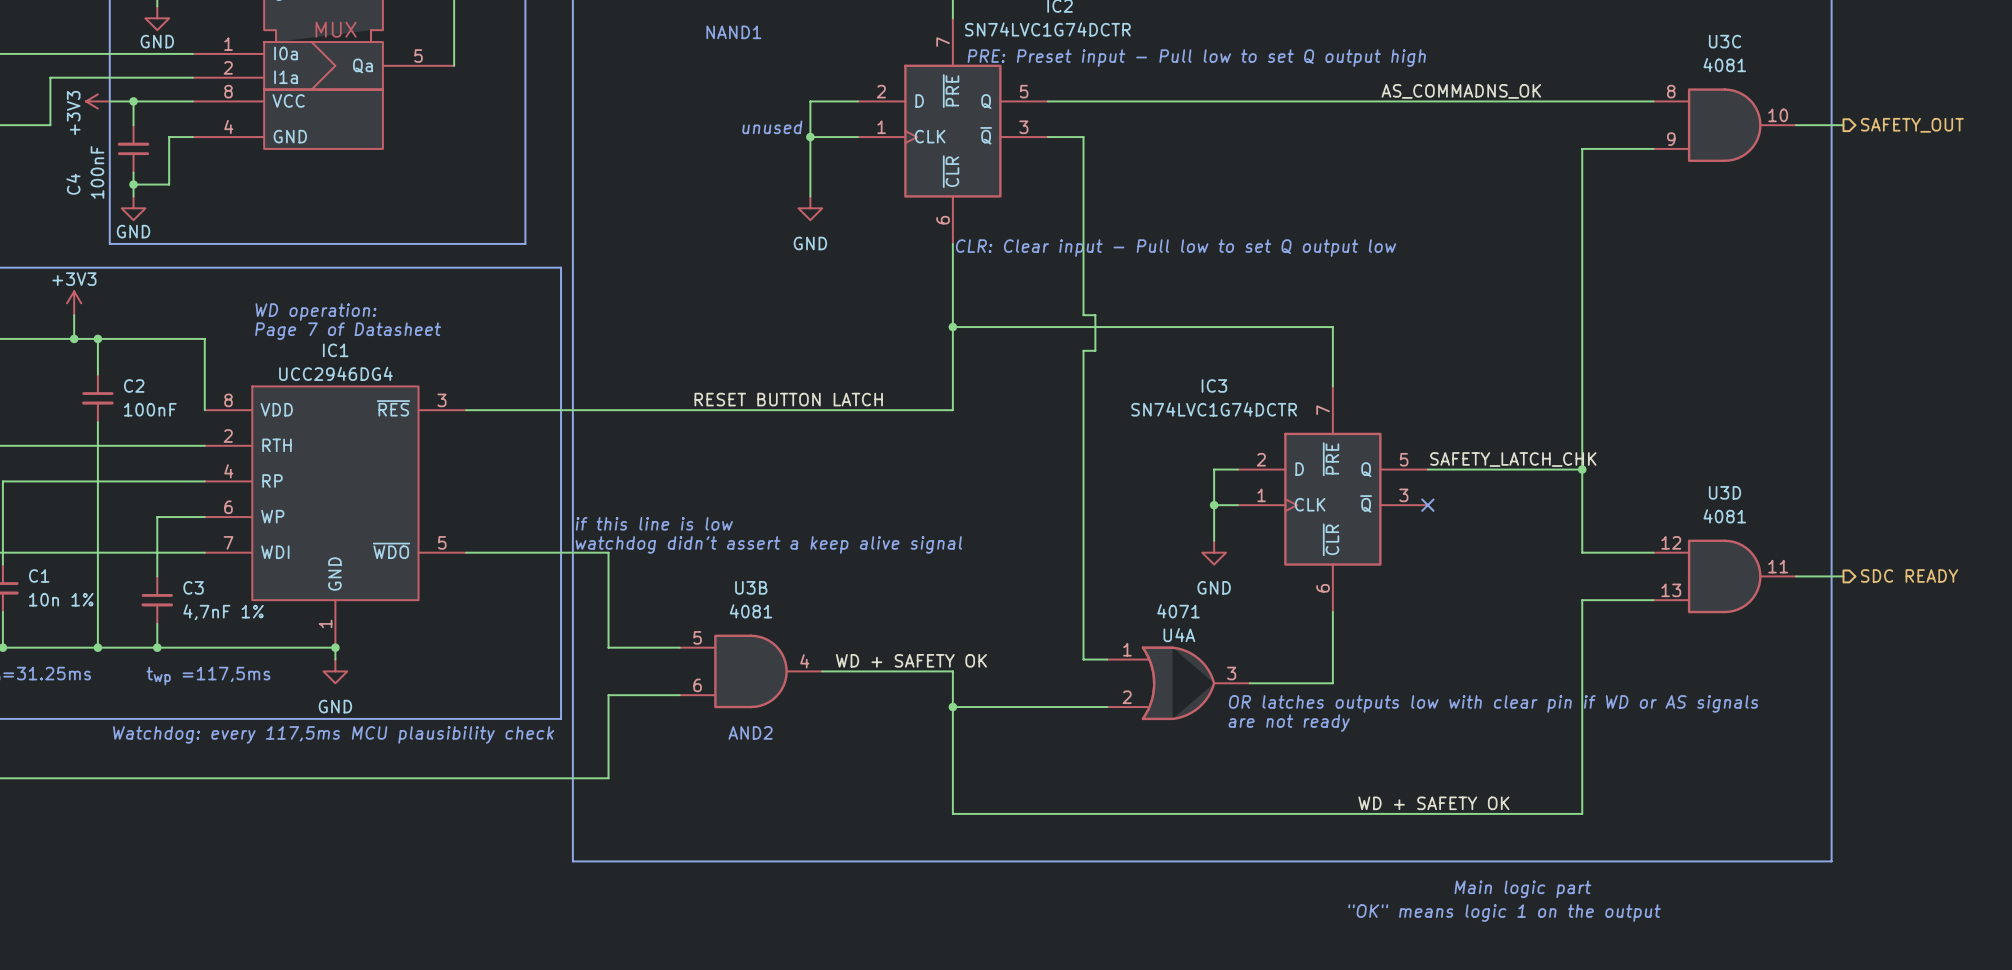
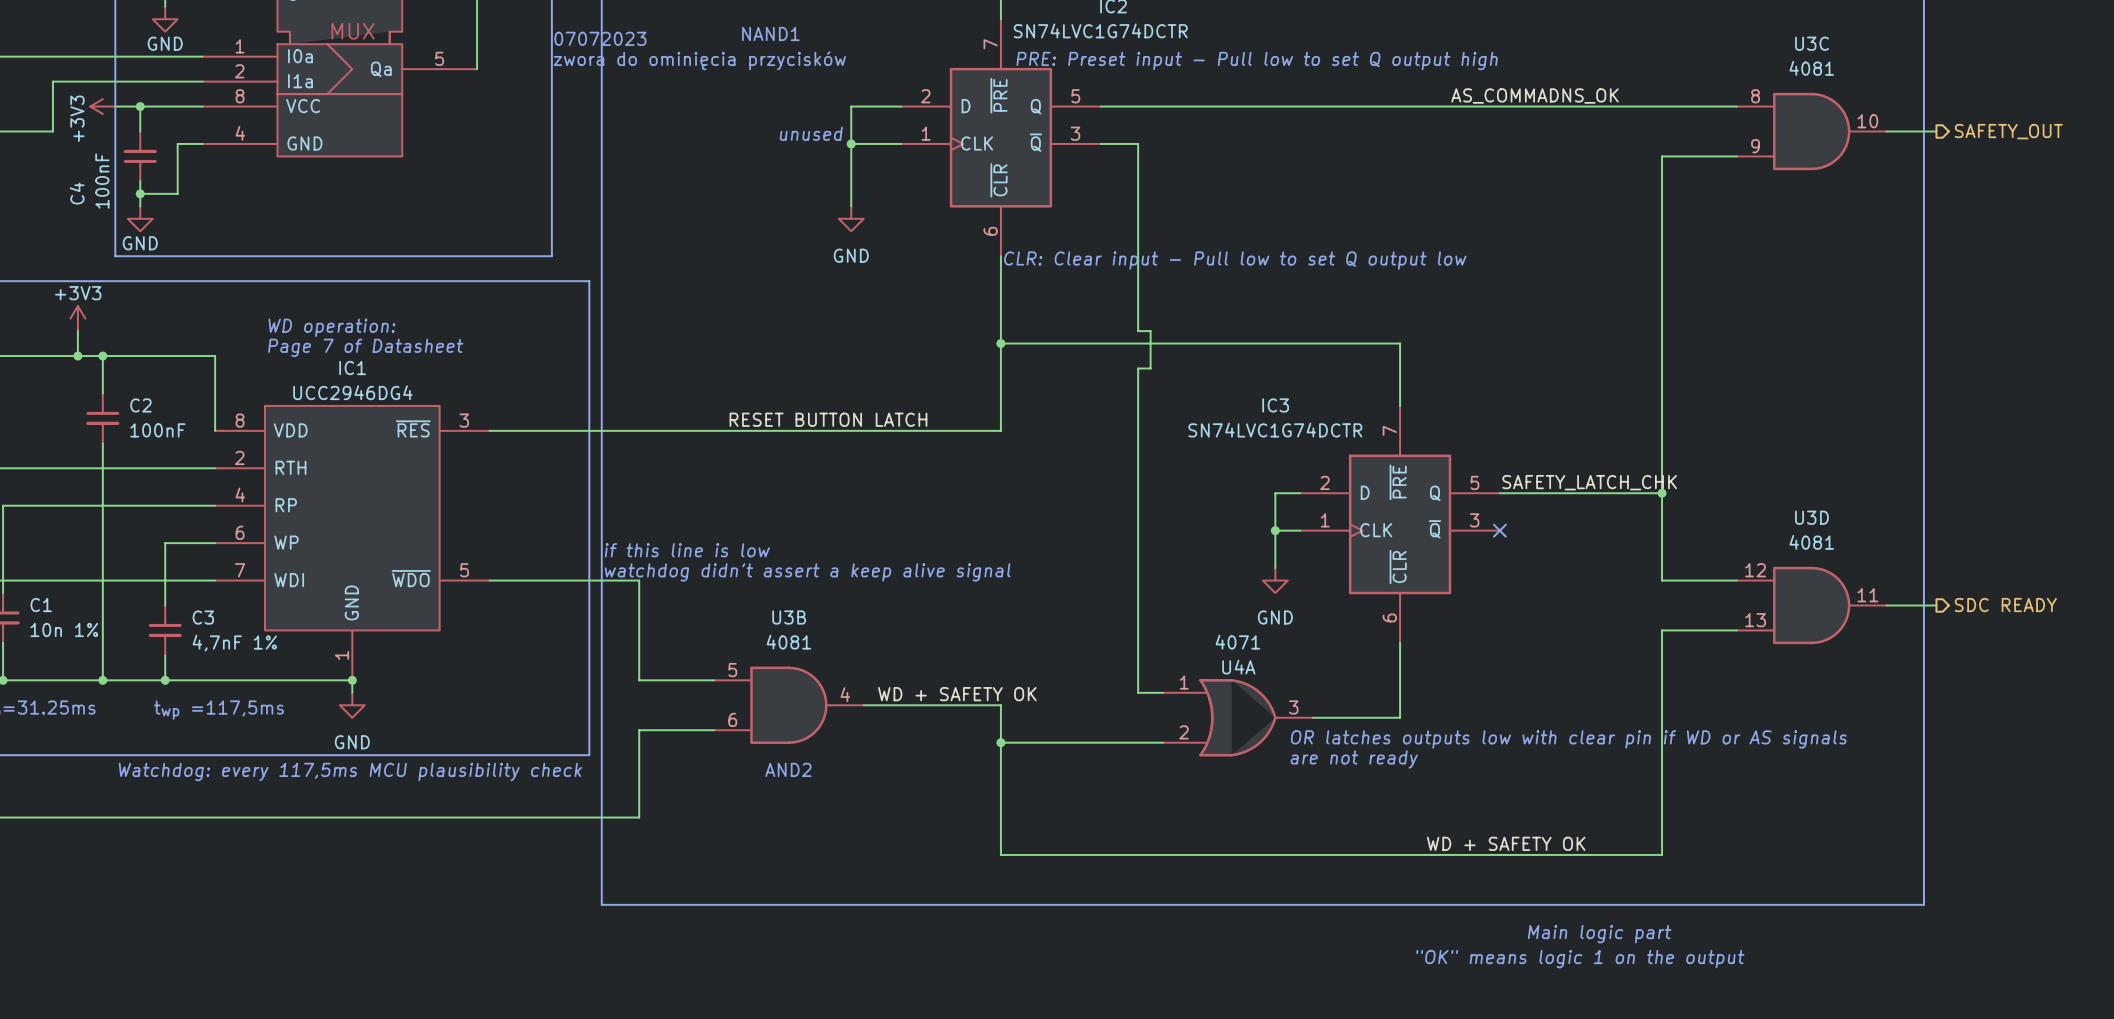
text: none -> 07072023 (600, 38)
text: none -> zwora do ominięcia przycisków (699, 60)

